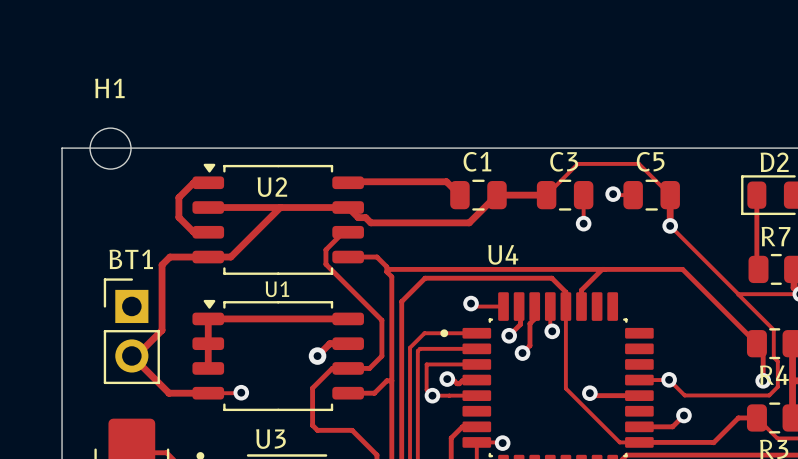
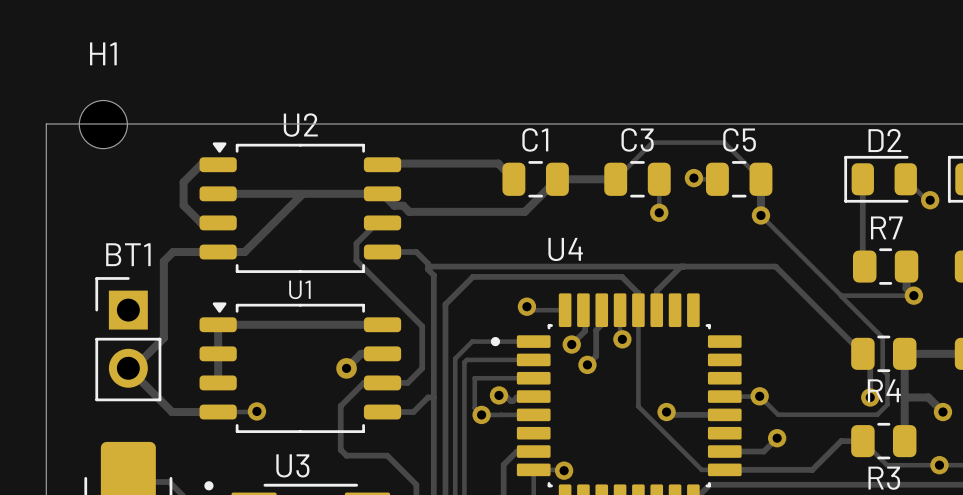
U2 name position: U2 (272, 187) -> U2 (300, 125)

